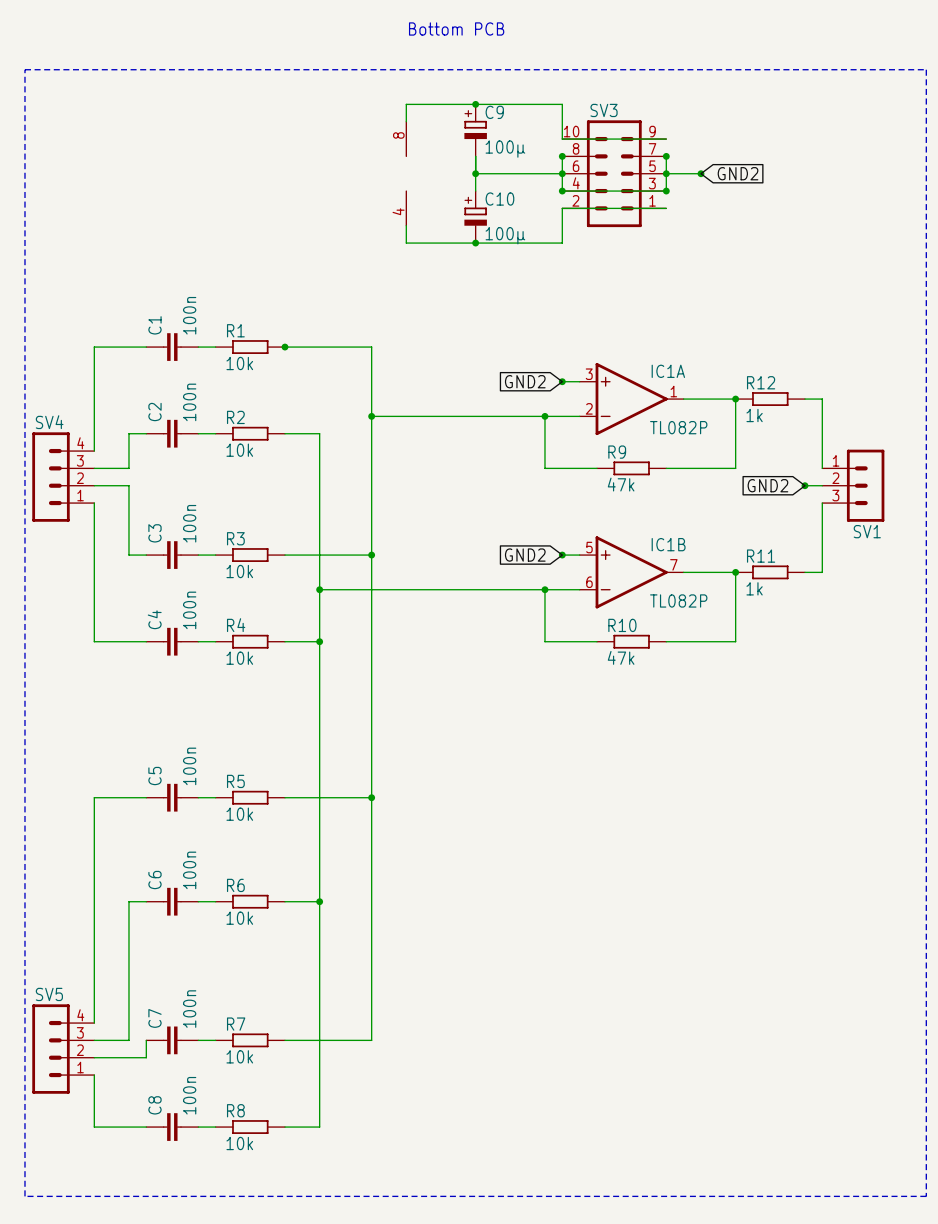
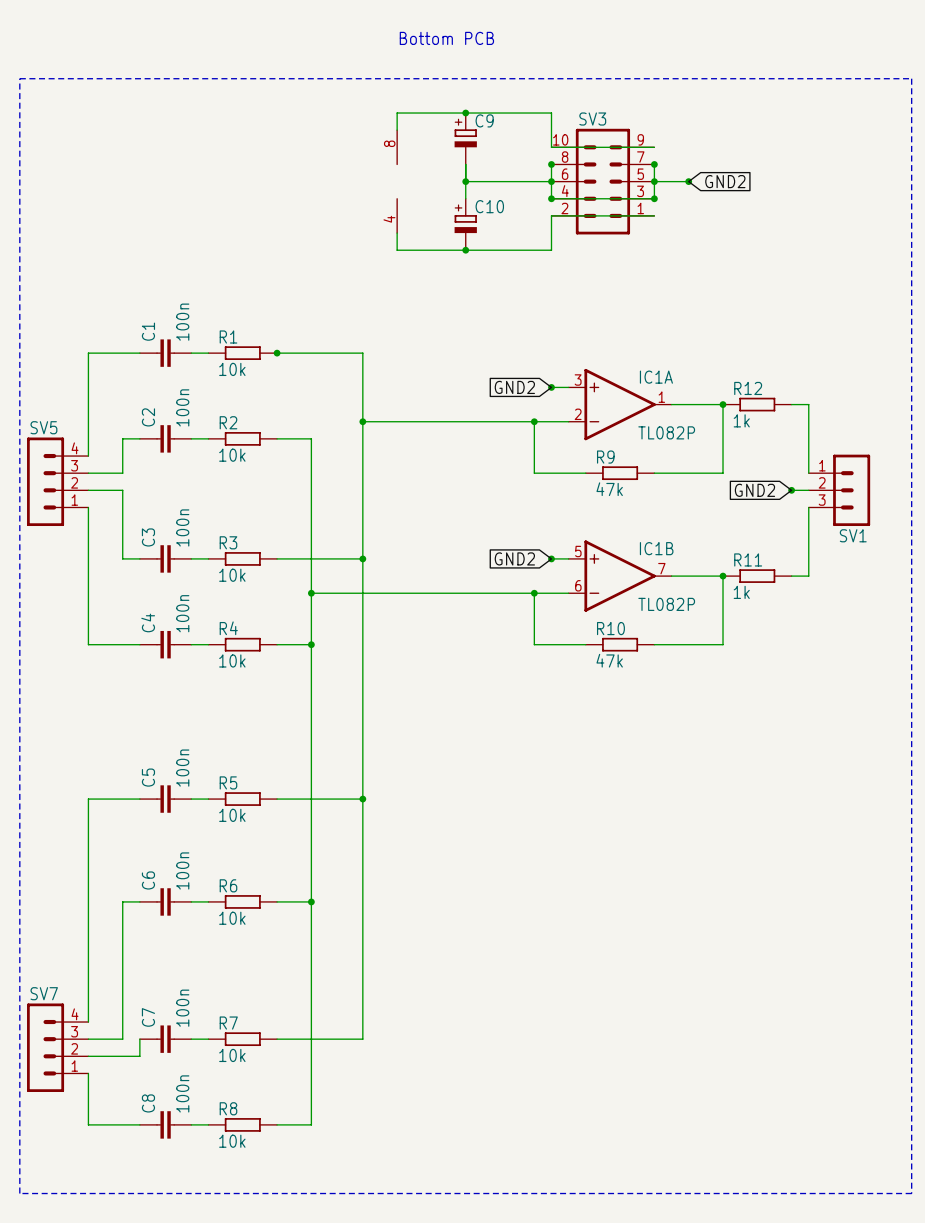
C9 value: 100µ (505, 149) -> none
C10 value: 100µ (505, 235) -> none
SV4 name: SV4 (49, 422) -> SV5 (43, 427)
SV5 name: SV5 (49, 994) -> SV7 (44, 993)

